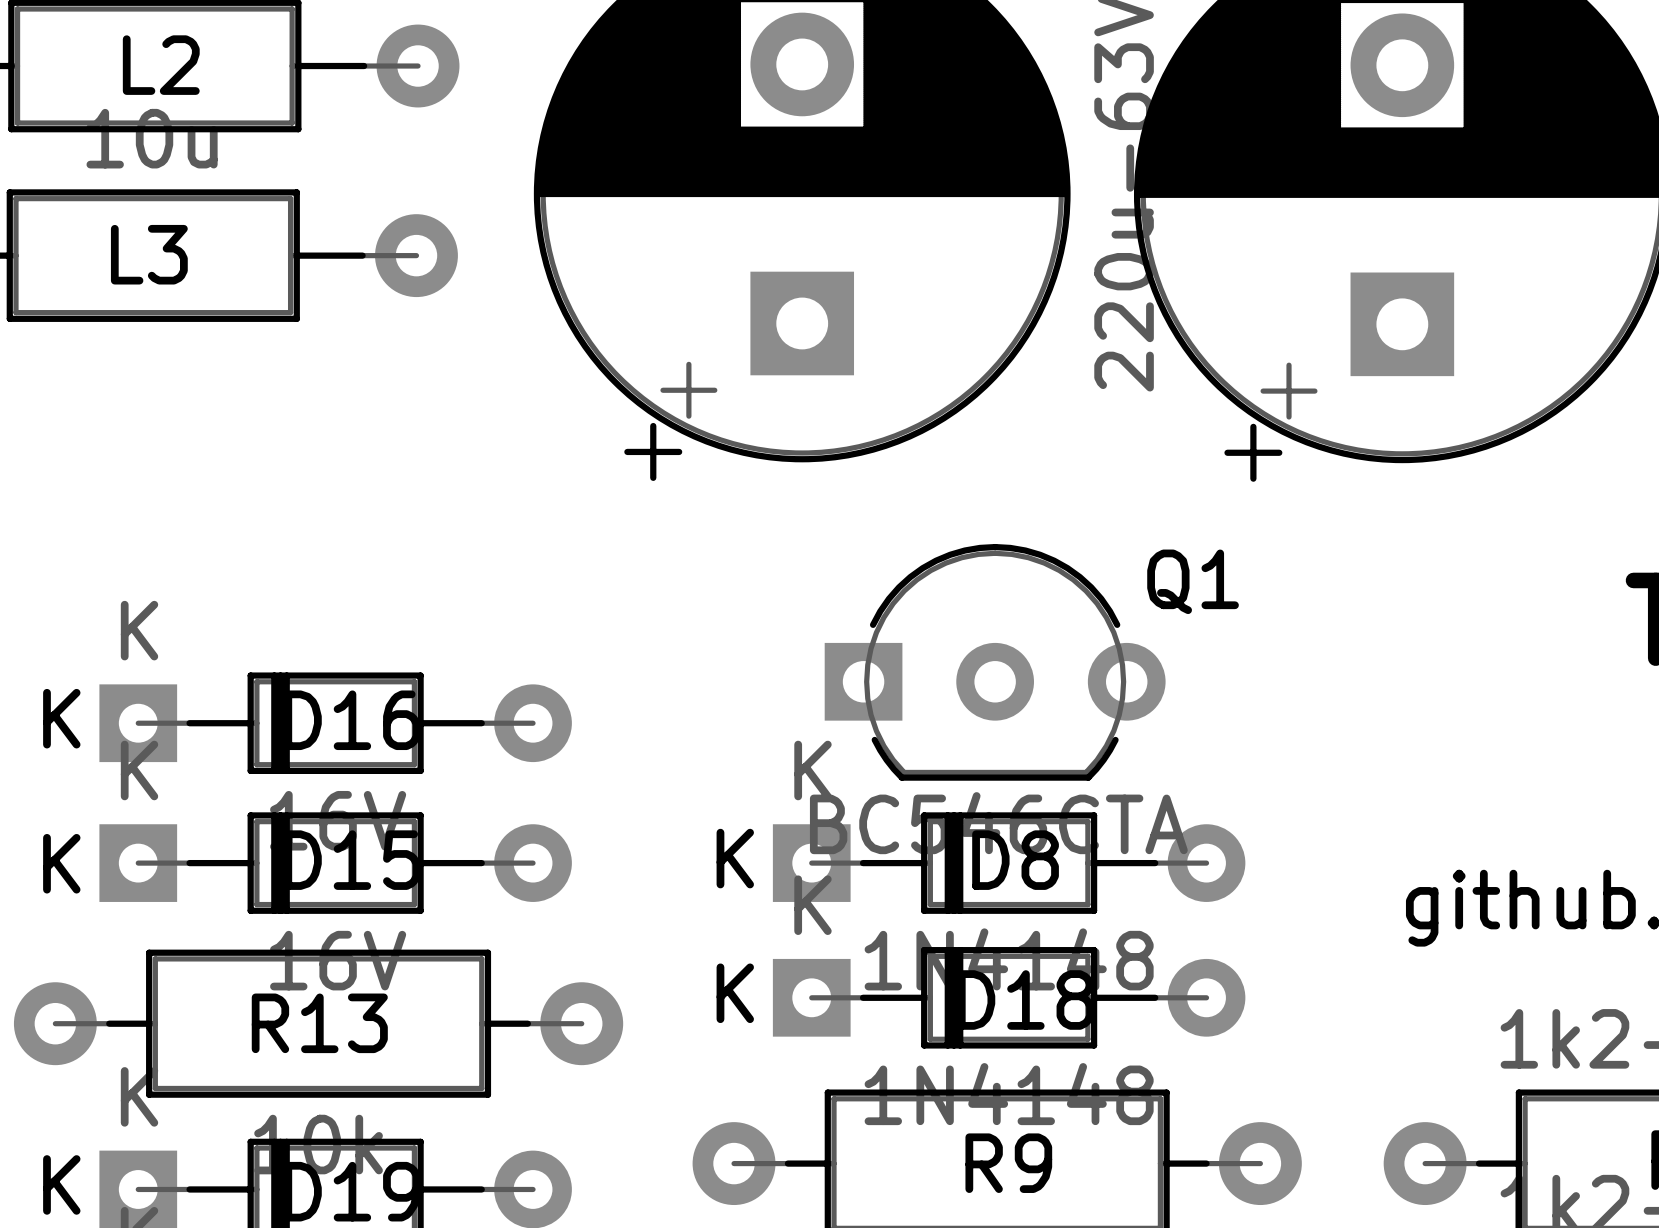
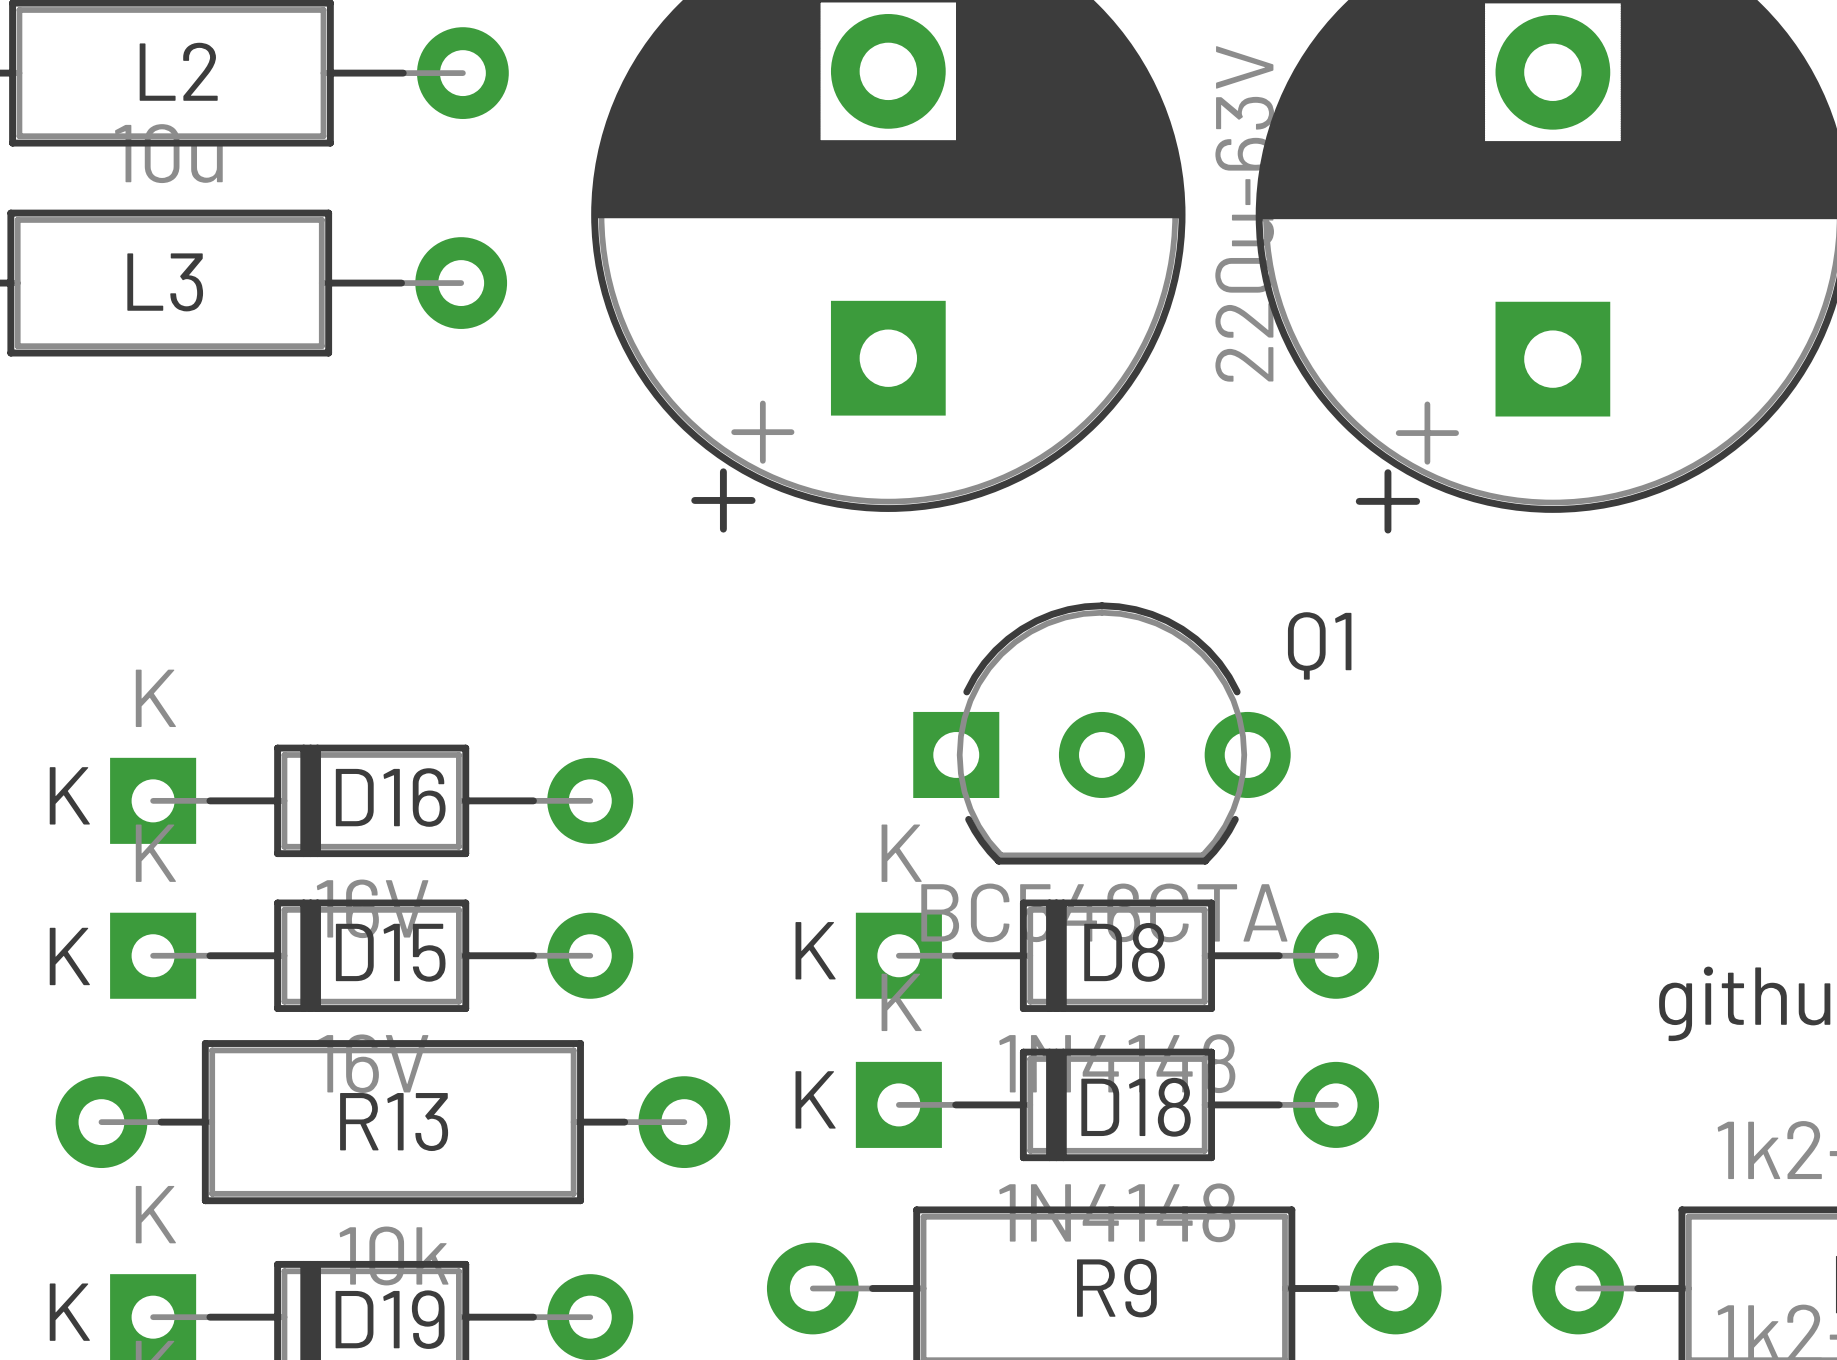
R13 position: (318, 1023) -> (392, 1122)

